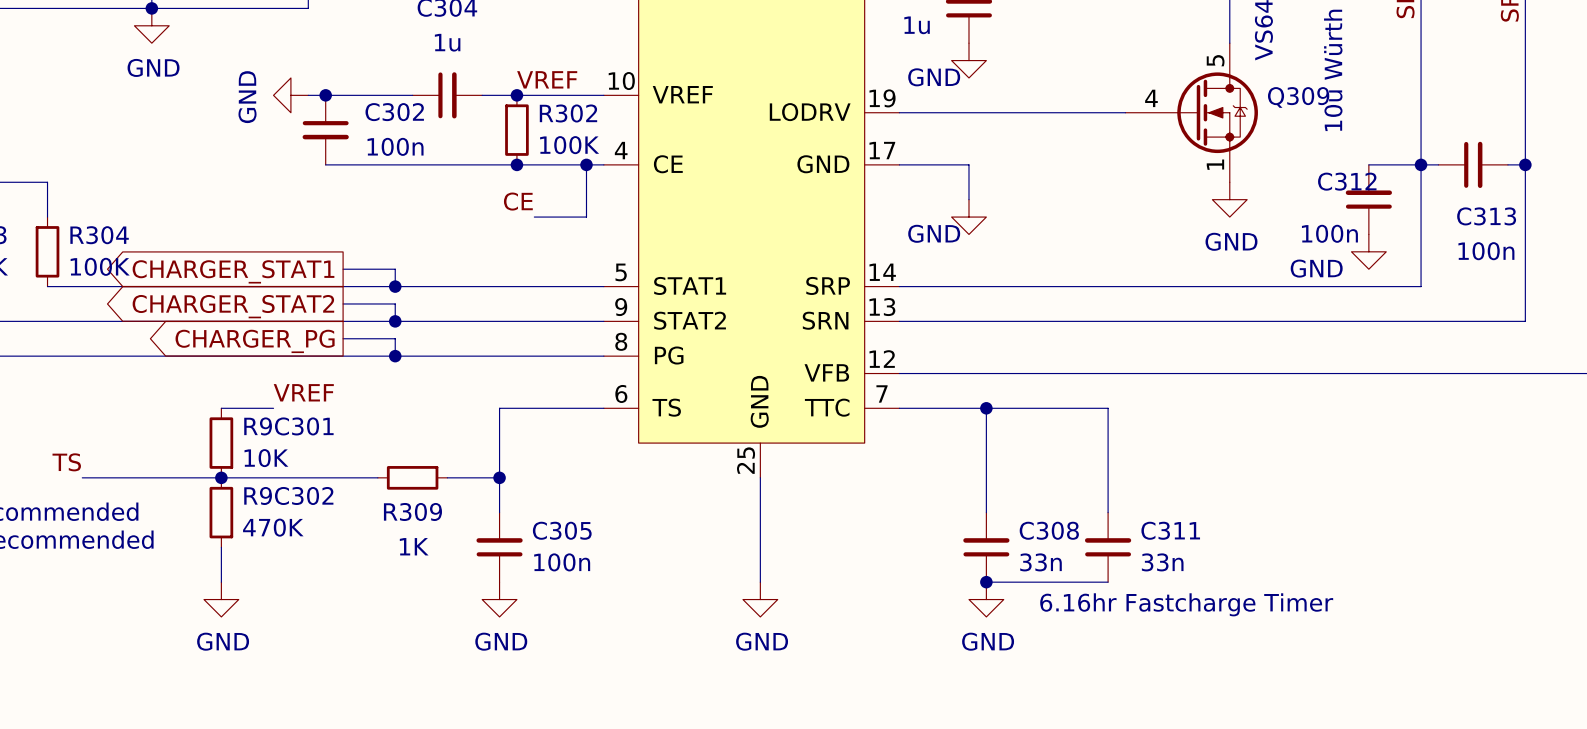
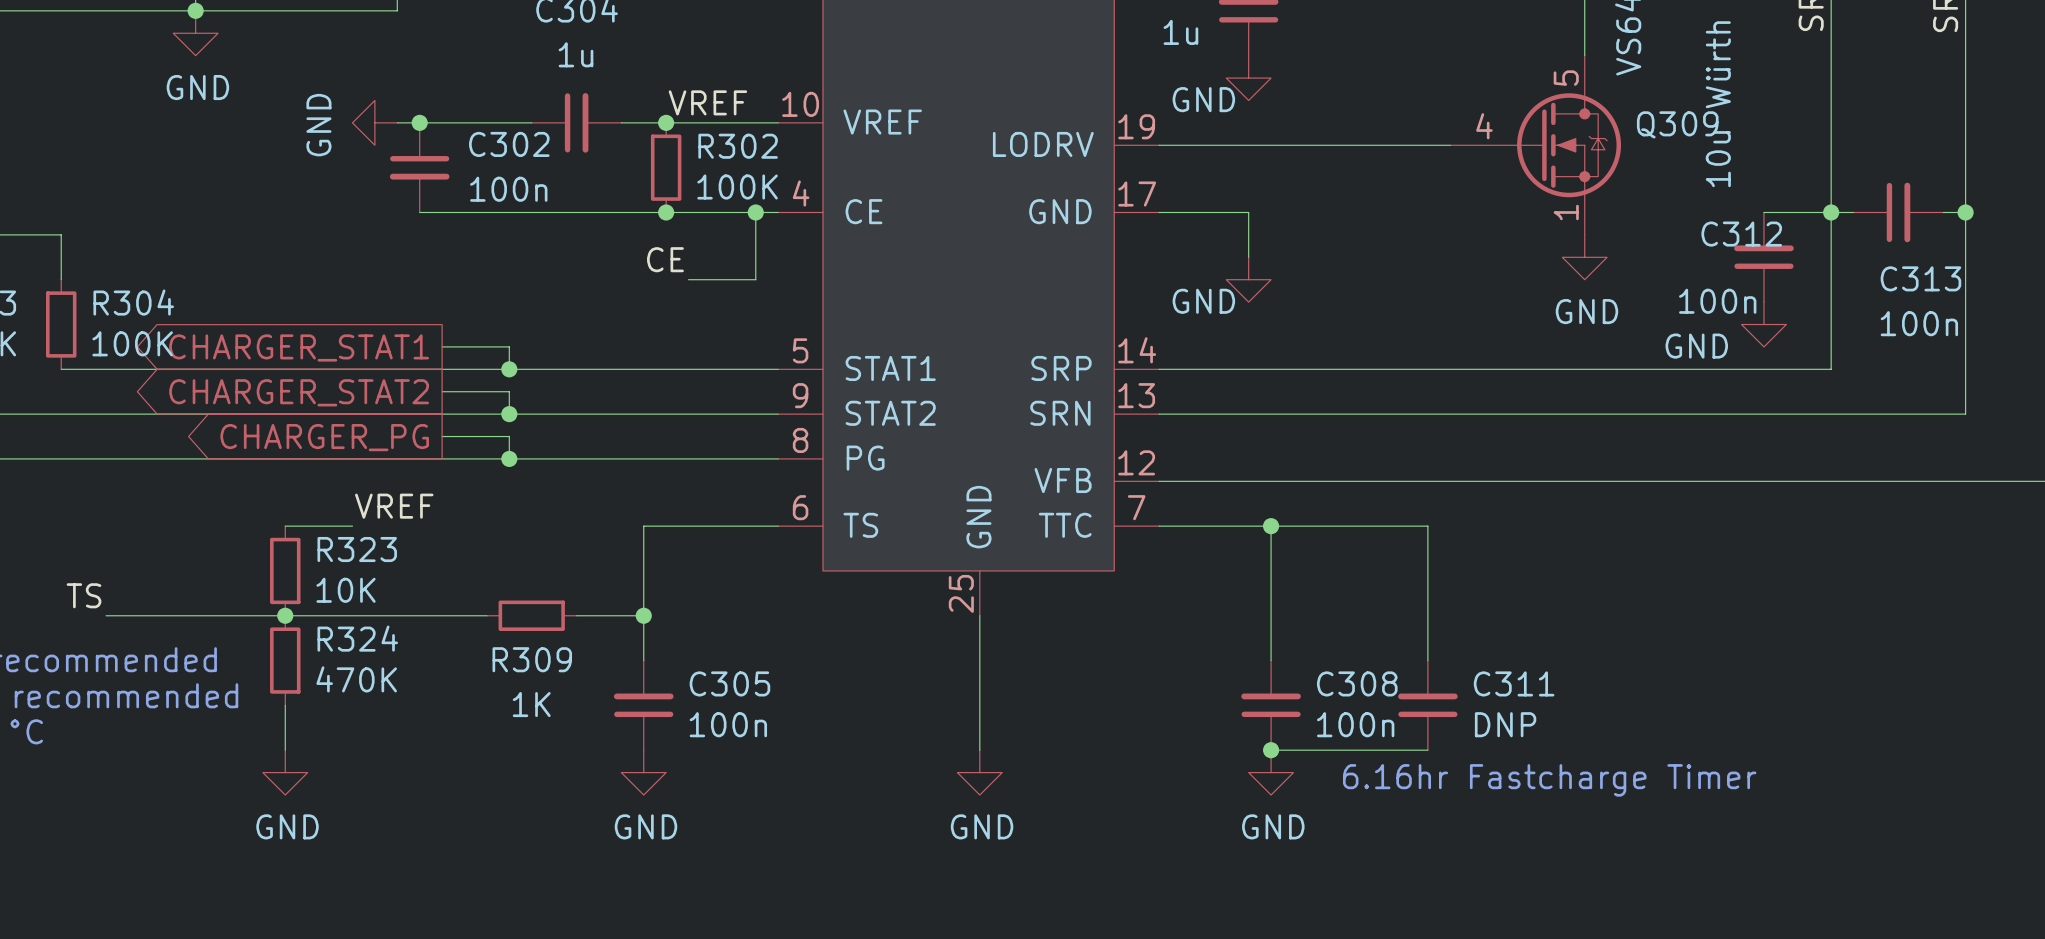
R9C301 name: R9C301 (288, 426) -> R323 (357, 549)
R9C302 name: R9C302 (288, 495) -> R324 (357, 638)
C308 value: 33n (1040, 562) -> 100n (1355, 724)
C311 value: 33n (1162, 562) -> DNP (1505, 724)

